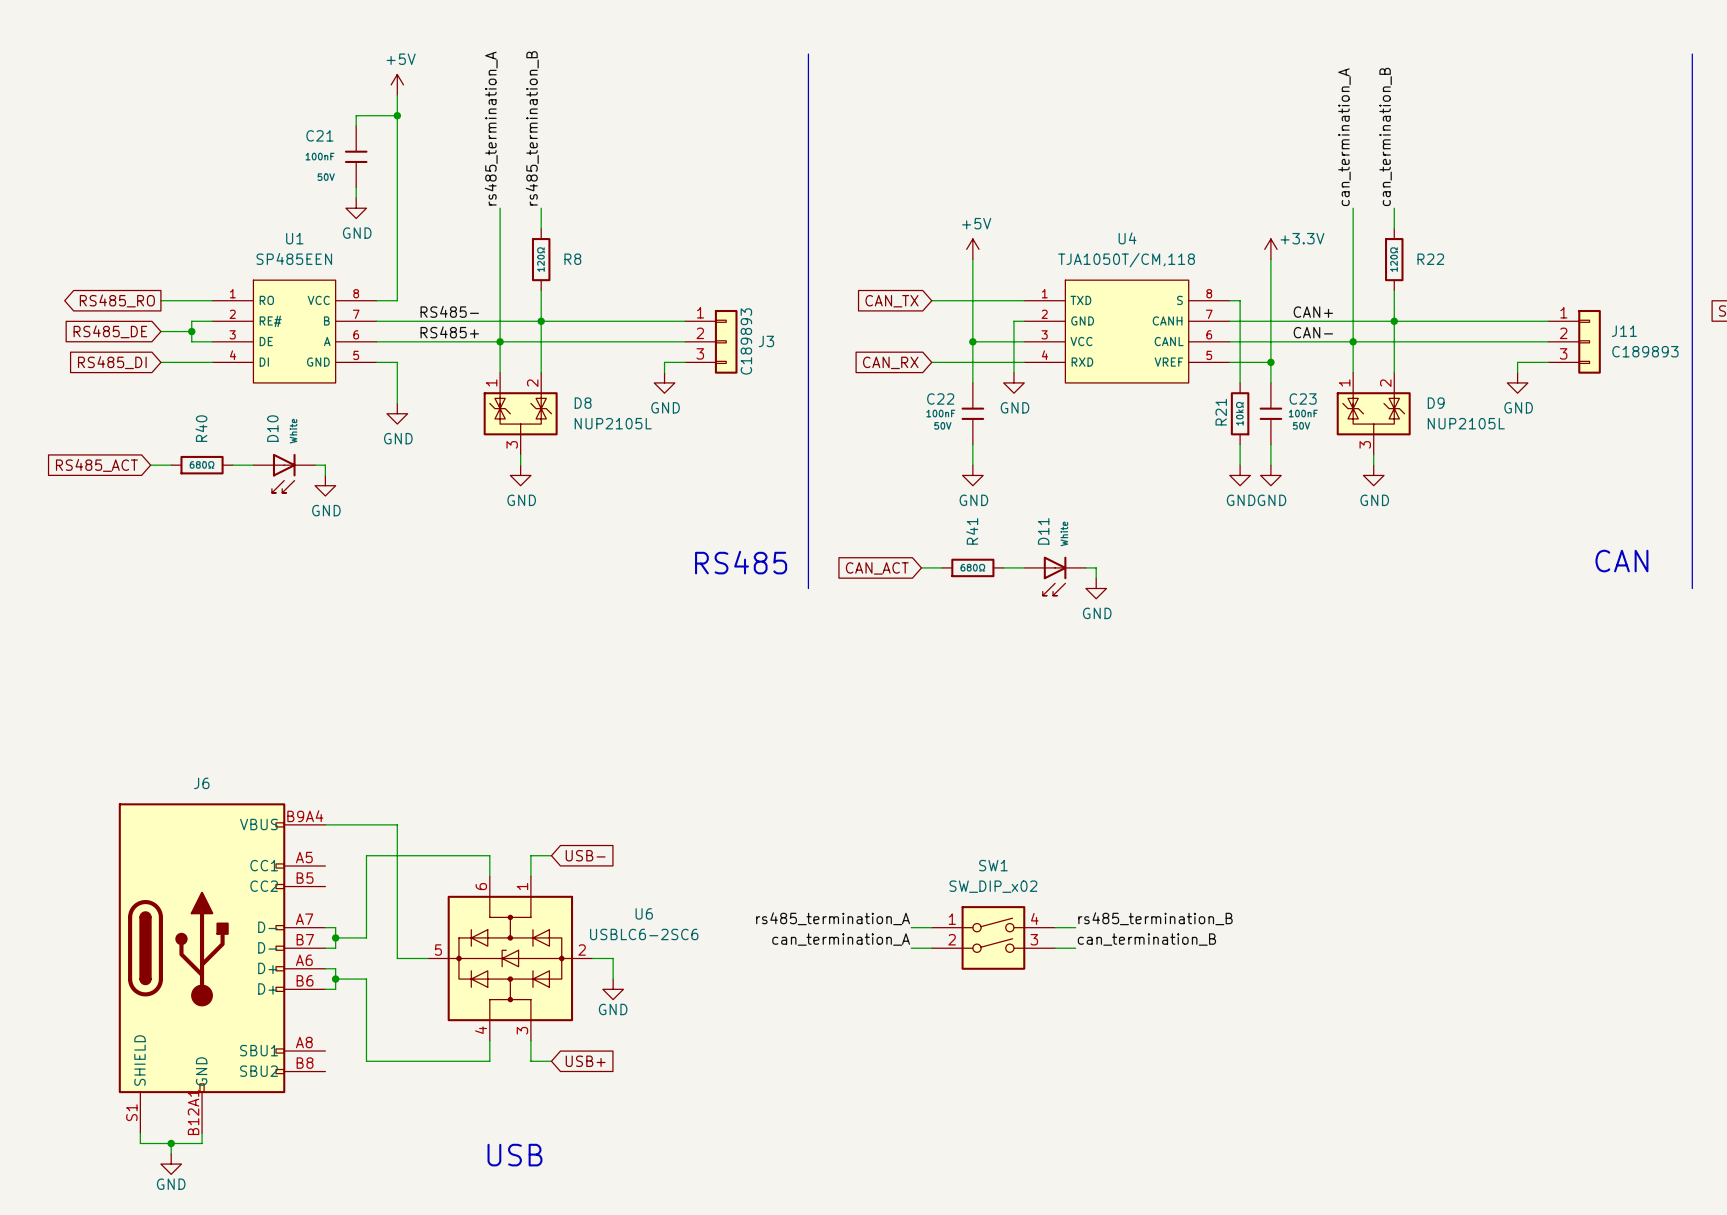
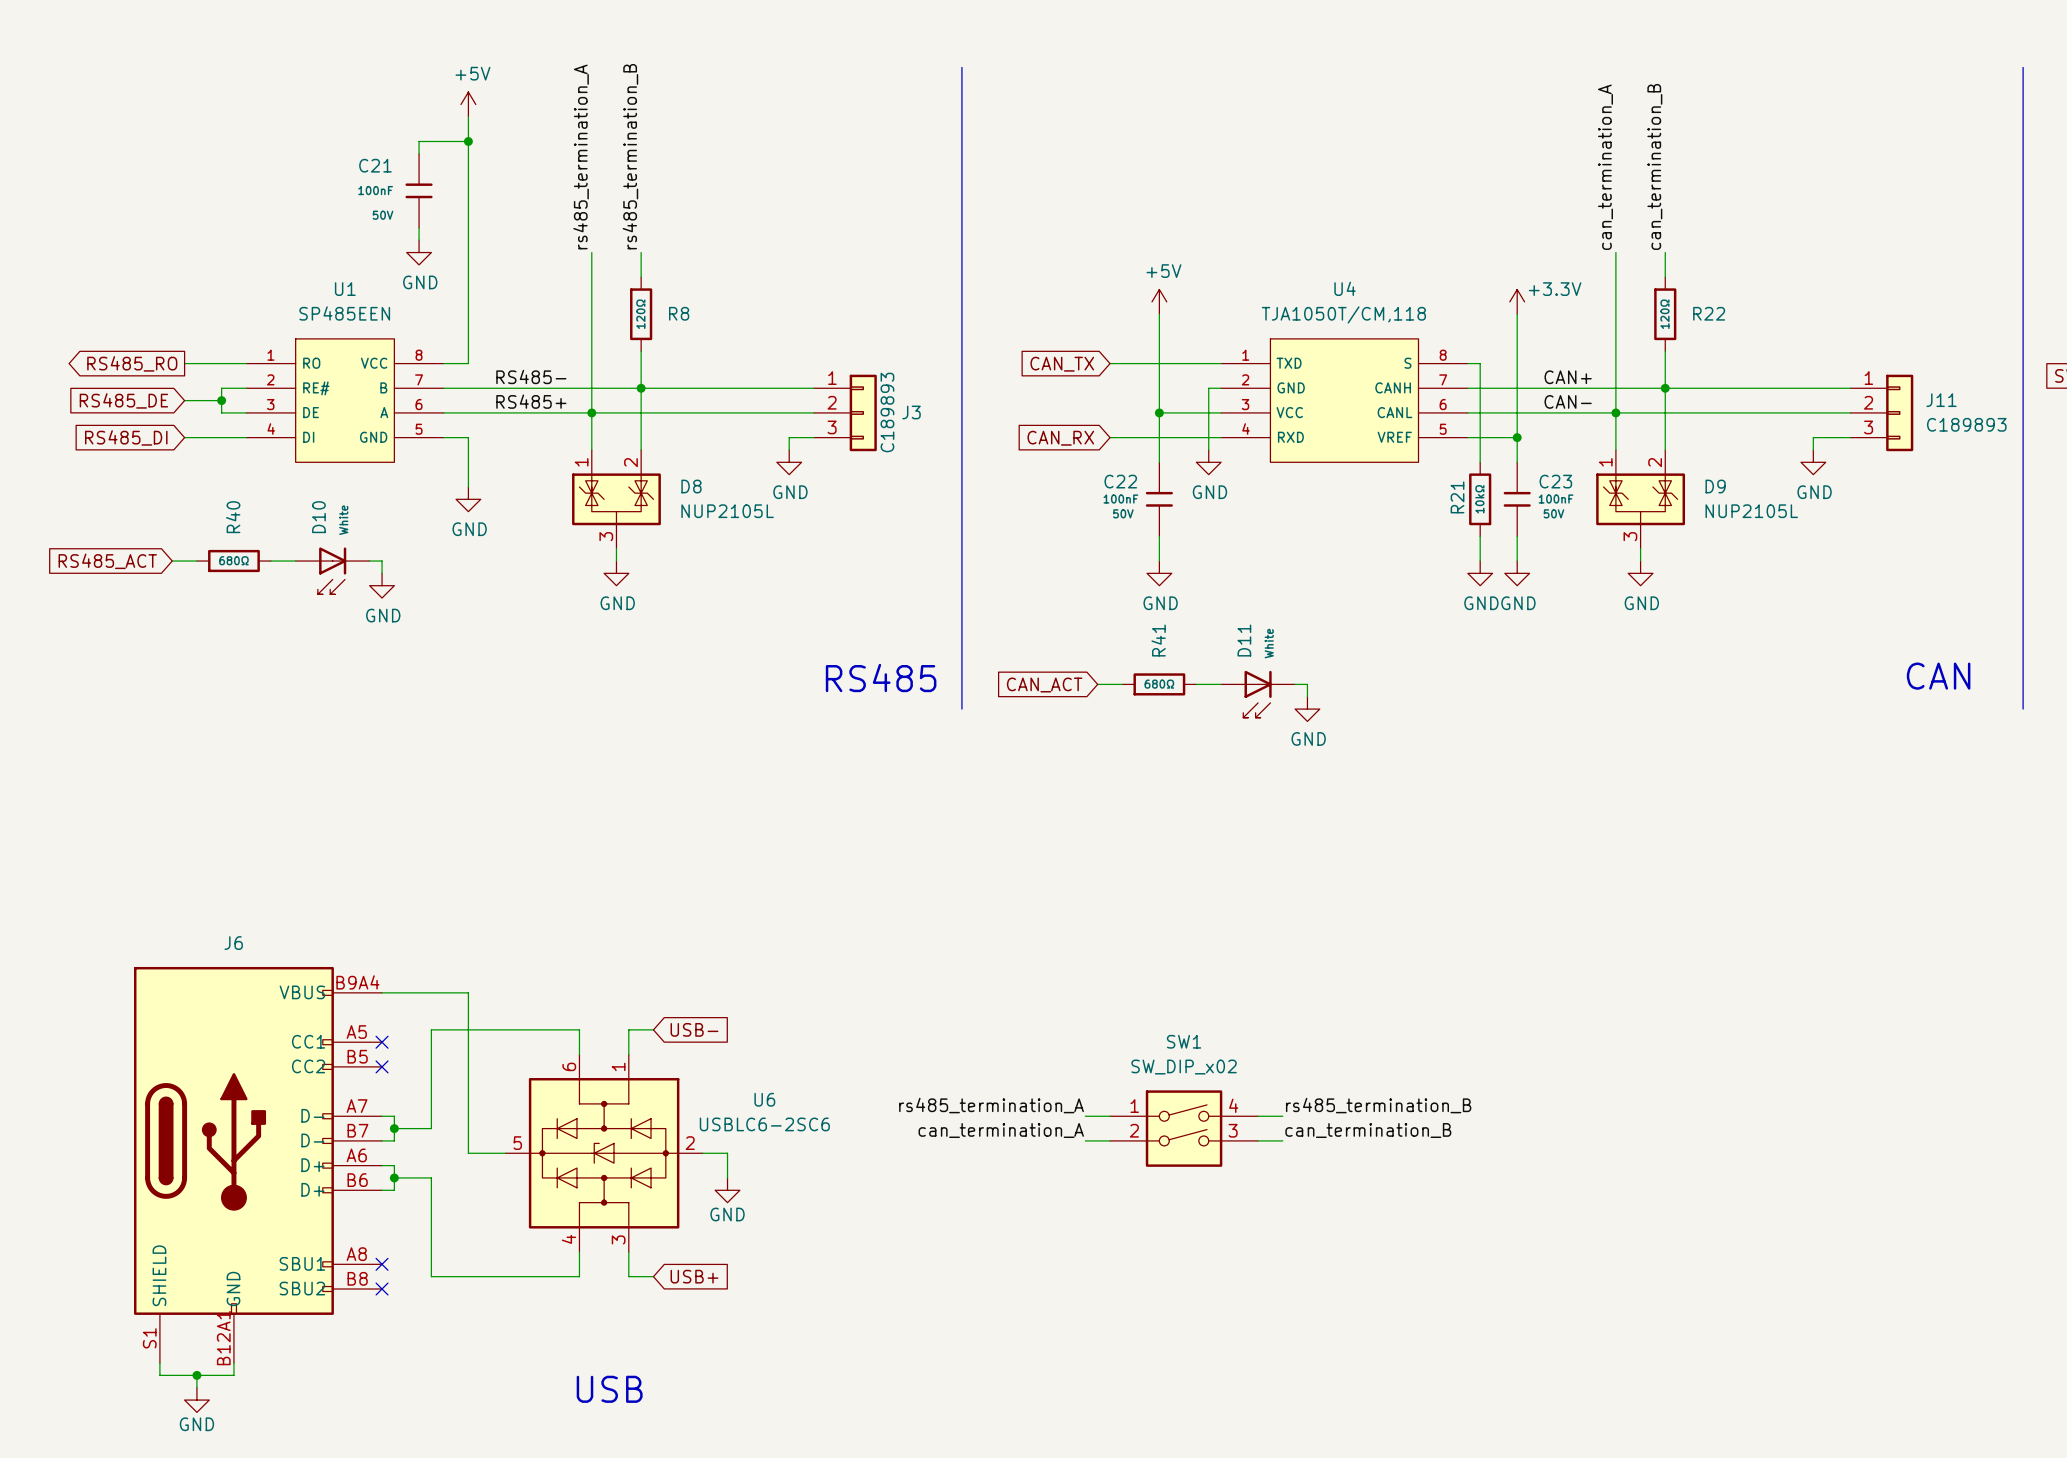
no-connect mark: none -> (382, 1042)
no-connect mark: none -> (382, 1066)
no-connect mark: none -> (382, 1264)
no-connect mark: none -> (382, 1289)

